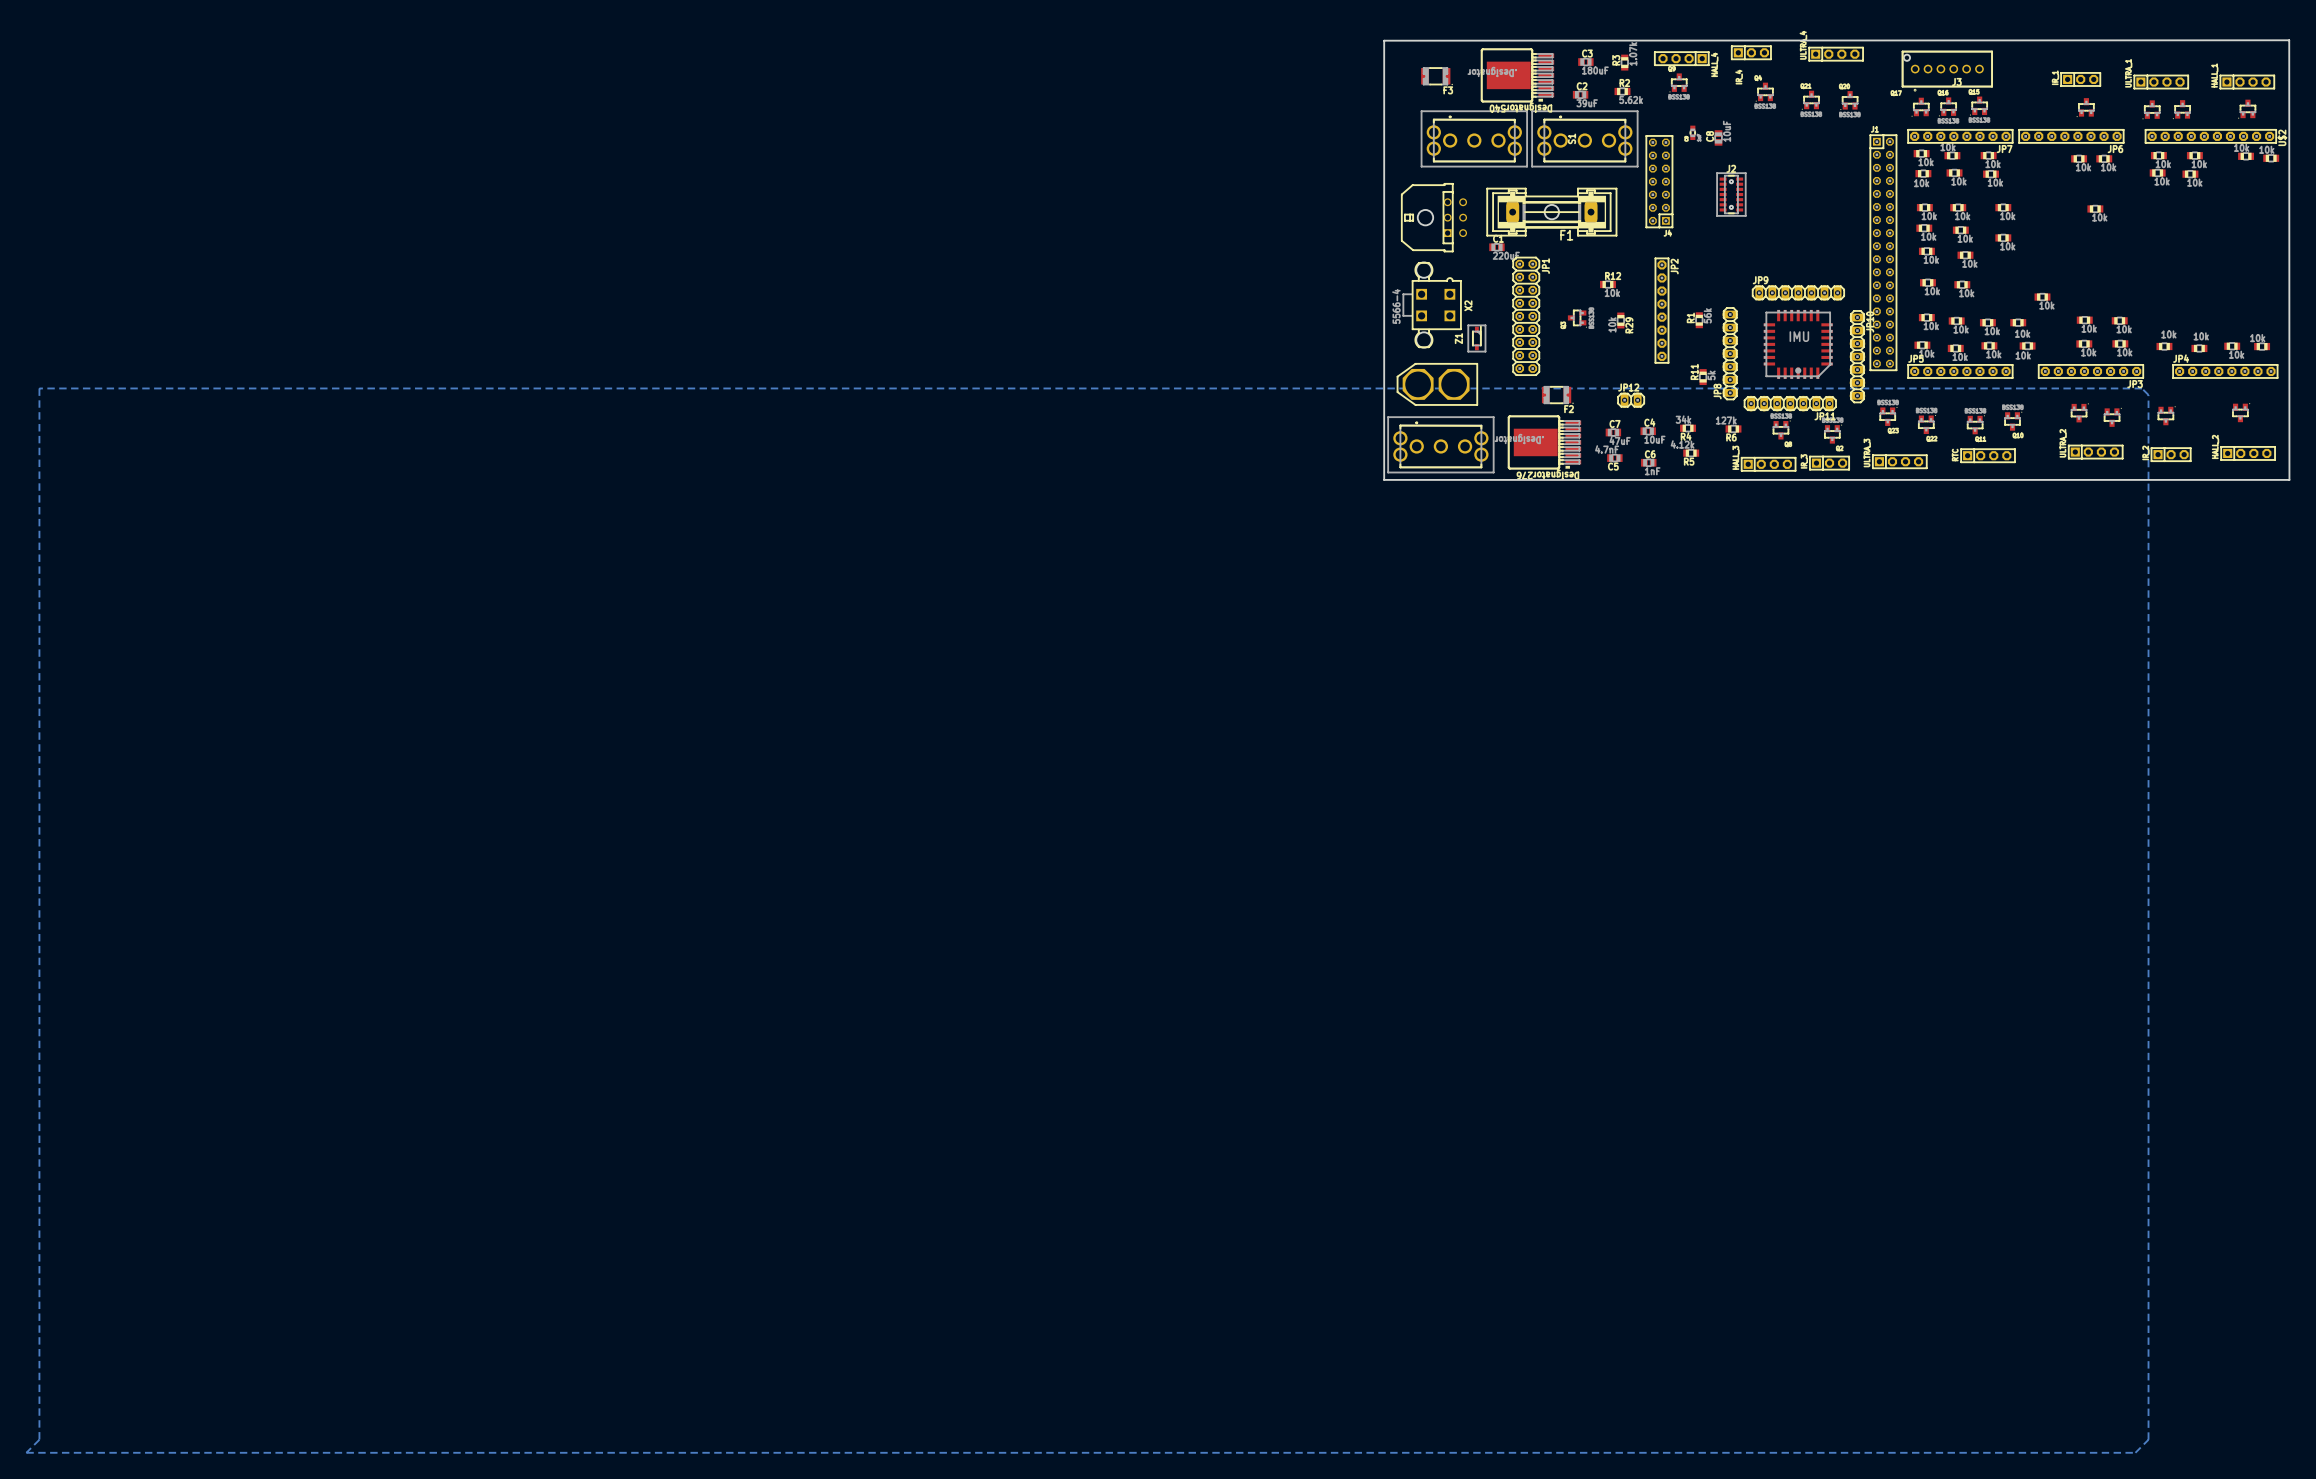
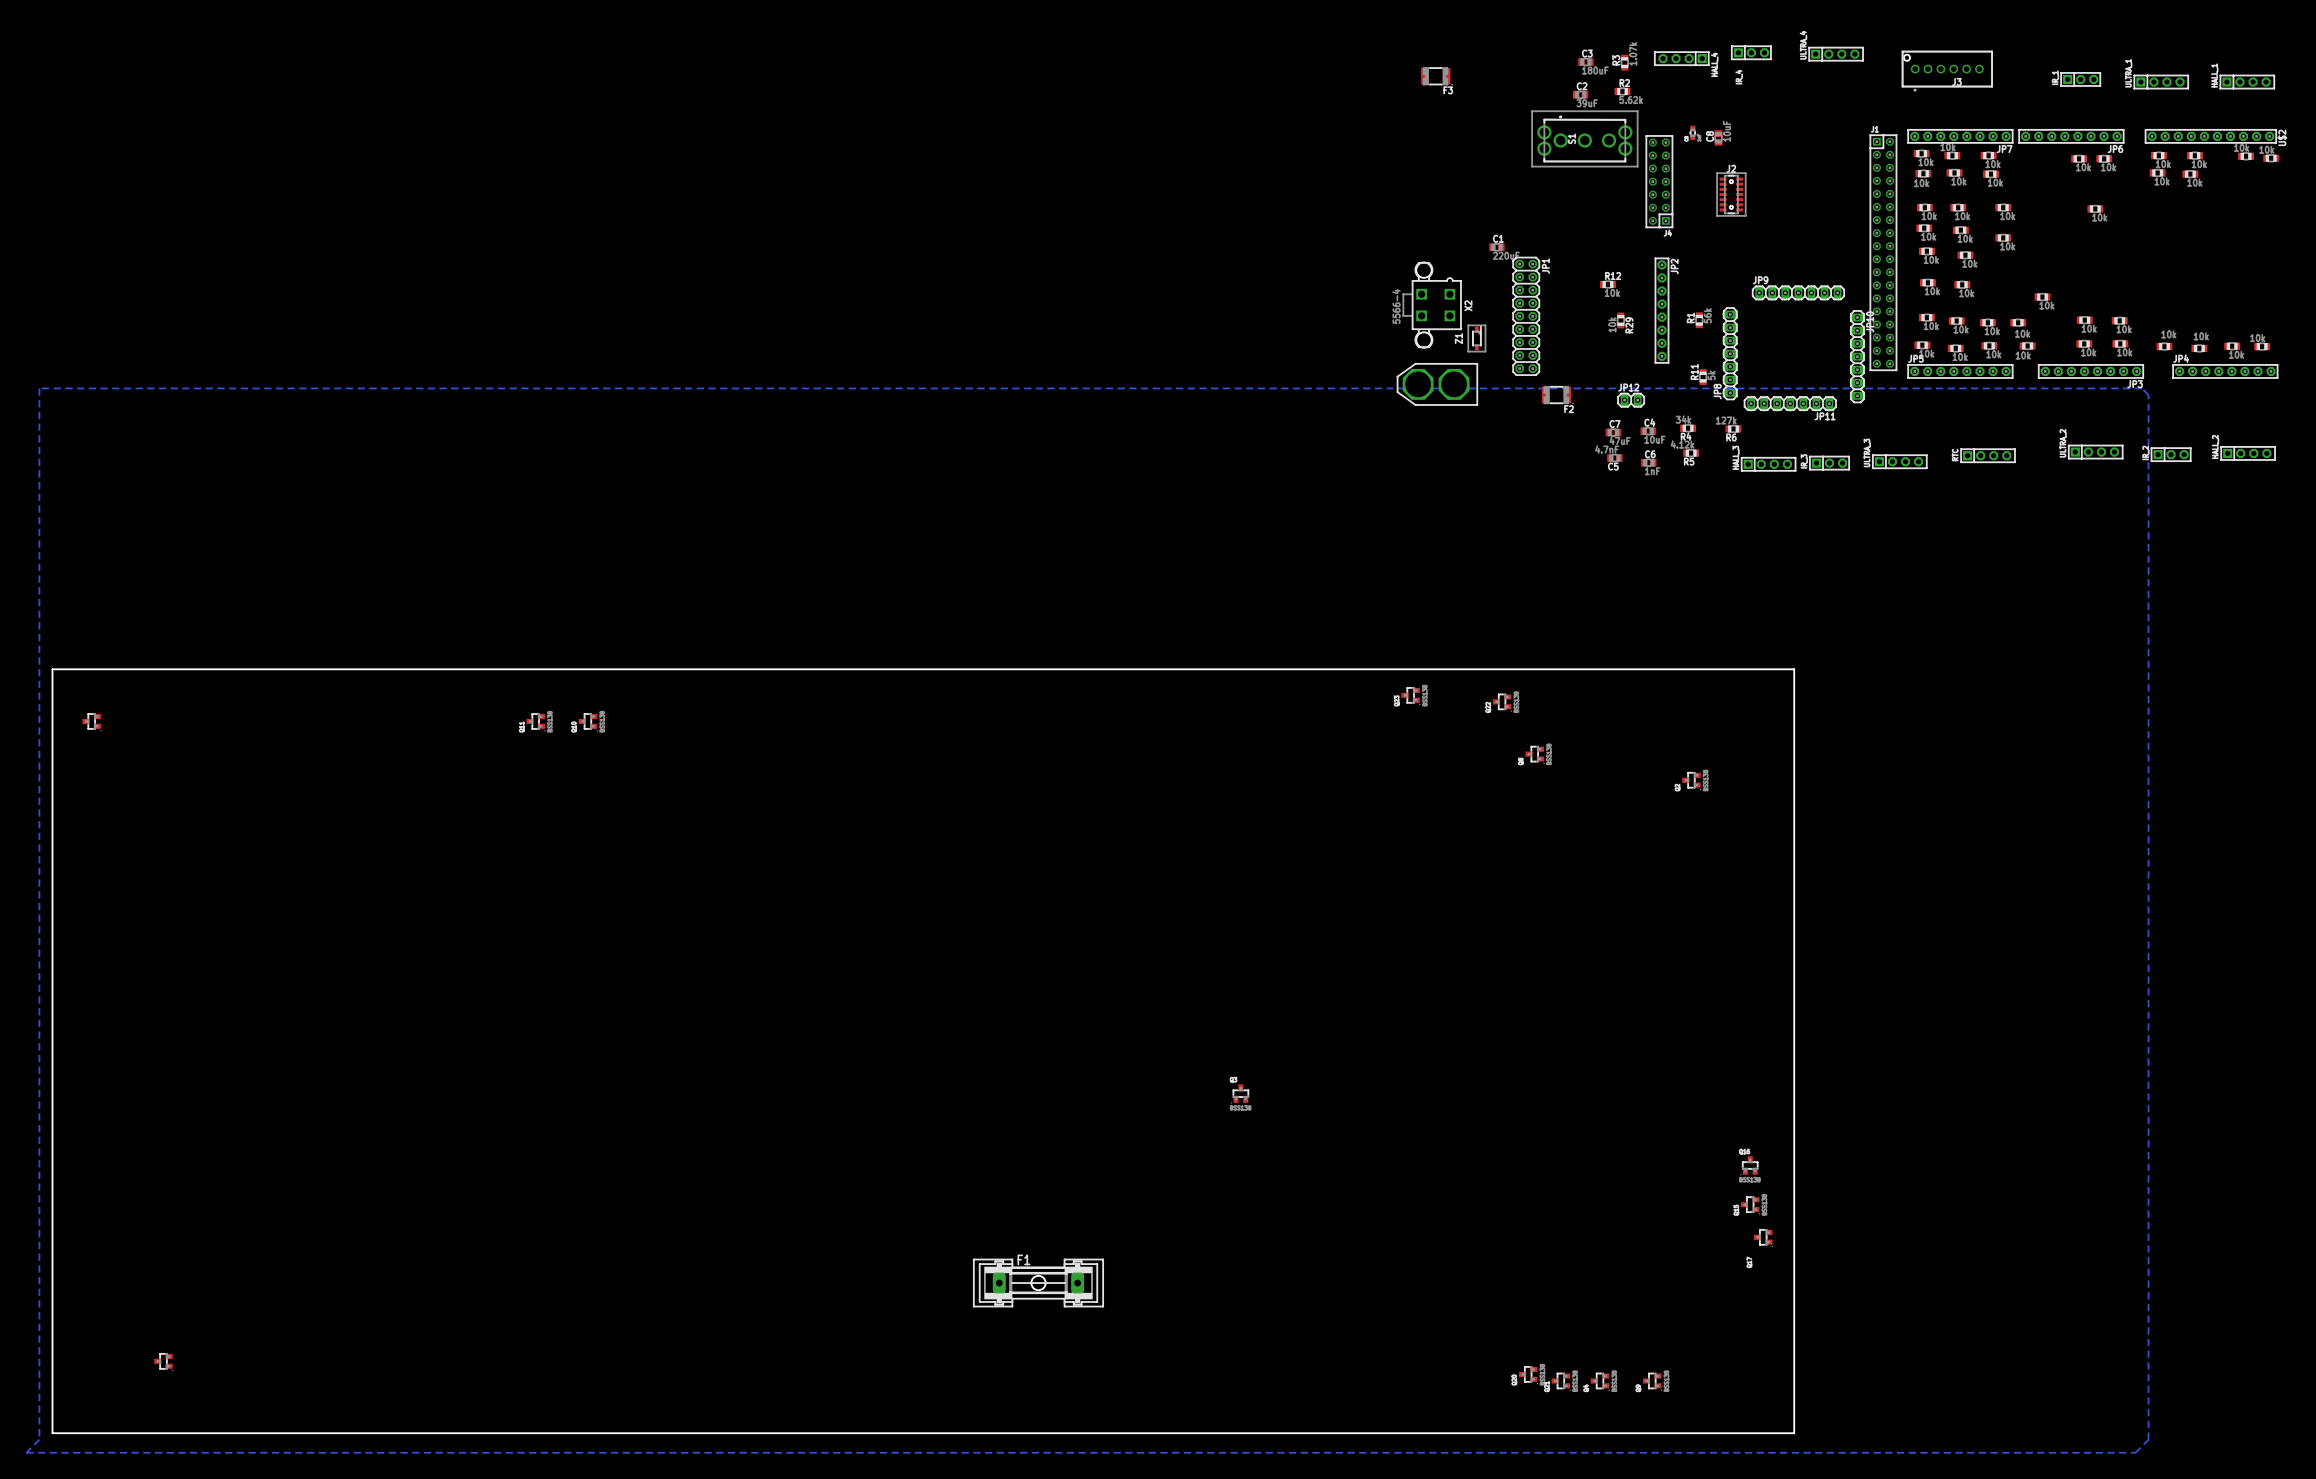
board edge: (2289, 40) (1384, 40) (1384, 479) (2289, 479) (2289, 40) -> none
part: (1517, 75) -> none
part rotation: 0° (1678, 82) -> 90° counterclockwise (1652, 1381)
part position: (1678, 82) -> (1652, 1381)
part rotation: 0° (1764, 92) -> 90° counterclockwise (1600, 1381)
part position: (1764, 92) -> (1600, 1381)
part rotation: 0° (1810, 100) -> 90° counterclockwise (1561, 1381)
part position: (1810, 100) -> (1561, 1381)
part rotation: 0° (1849, 100) -> 90° counterclockwise (1528, 1375)
part position: (1849, 100) -> (1528, 1375)
part position: (1947, 106) -> (1749, 1165)
part rotation: 0° (1978, 106) -> 90° counterclockwise (1750, 1205)
part position: (1978, 106) -> (1750, 1205)
part rotation: 0° (1920, 107) -> 90° counterclockwise (1763, 1238)
part position: (1920, 107) -> (1763, 1238)
part: (2085, 107) -> none
part: (2151, 109) -> none
part: (2181, 109) -> none
part: (2246, 109) -> none
part: (1474, 138) -> none
F1 rotation: 0° (1551, 212) -> 180° (1038, 1283)
F1 position: (1551, 212) -> (1038, 1283)
part: (1434, 217) -> none
part rotation: 0° (1577, 318) -> 90° clockwise (1239, 1093)
part position: (1577, 318) -> (1239, 1093)
part: IMU (1798, 344) -> none
part: (2080, 412) -> none
part: (2241, 412) -> none
part: (2166, 415) -> none
part rotation: 0° (1888, 416) -> 90° clockwise (1410, 696)
part position: (1888, 416) -> (1410, 696)
part: (2113, 417) -> none
part rotation: 0° (2013, 421) -> 90° clockwise (588, 722)
part position: (2013, 421) -> (588, 722)
part rotation: 0° (1927, 424) -> 90° clockwise (1502, 702)
part position: (1927, 424) -> (1502, 702)
part rotation: 0° (1976, 424) -> 90° clockwise (535, 722)
part position: (1976, 424) -> (535, 722)
part rotation: 0° (1781, 430) -> 90° clockwise (1534, 755)
part position: (1781, 430) -> (1534, 755)
part rotation: 0° (1833, 434) -> 90° clockwise (1691, 781)
part position: (1833, 434) -> (1691, 781)
part: (1544, 442) -> none
part: (1440, 444) -> none
board edge: none -> (52, 669) (1794, 669) (1794, 1433) (52, 1433) (52, 669)
part: none -> (91, 722)
part: none -> (163, 1362)

